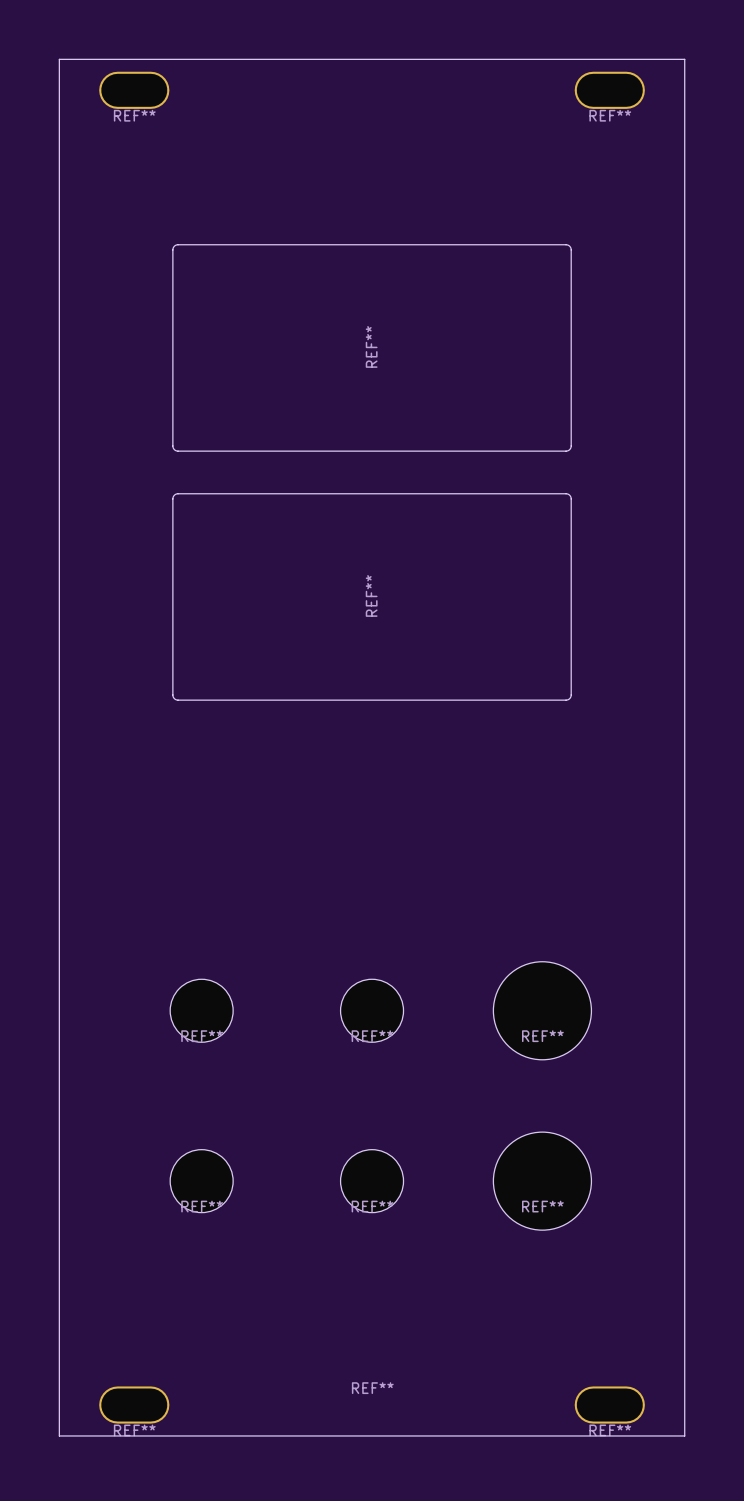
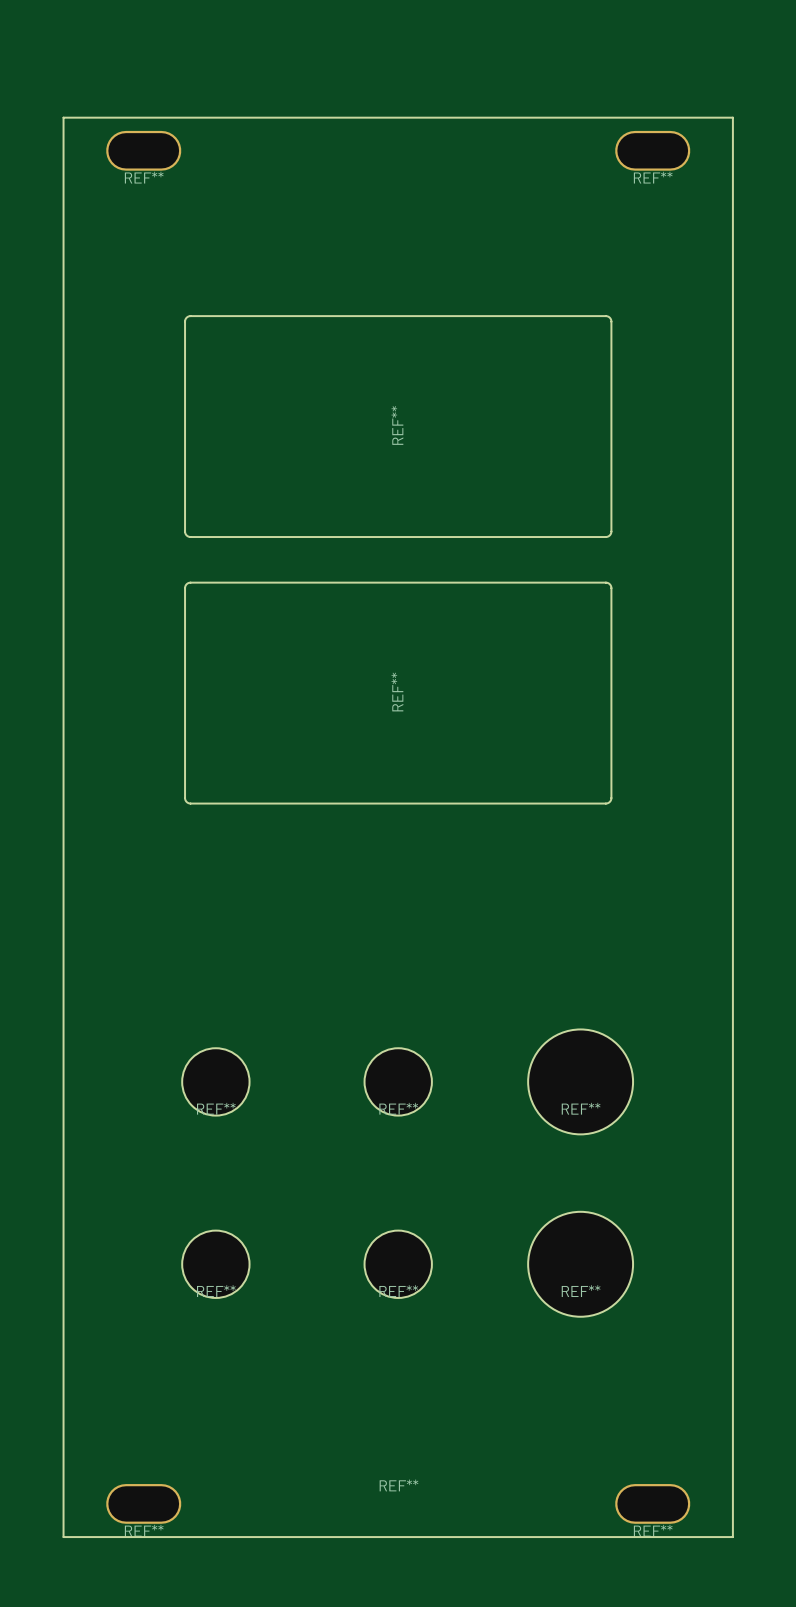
REF** position: (134, 90) -> (143, 150)
REF** position: (609, 90) -> (652, 150)
board edge: (59, 109) (59, 59) (684, 59) (684, 109) -> (63, 117) (732, 117)
REF** position: (372, 347) -> (398, 426)
REF** position: (372, 596) -> (398, 693)

